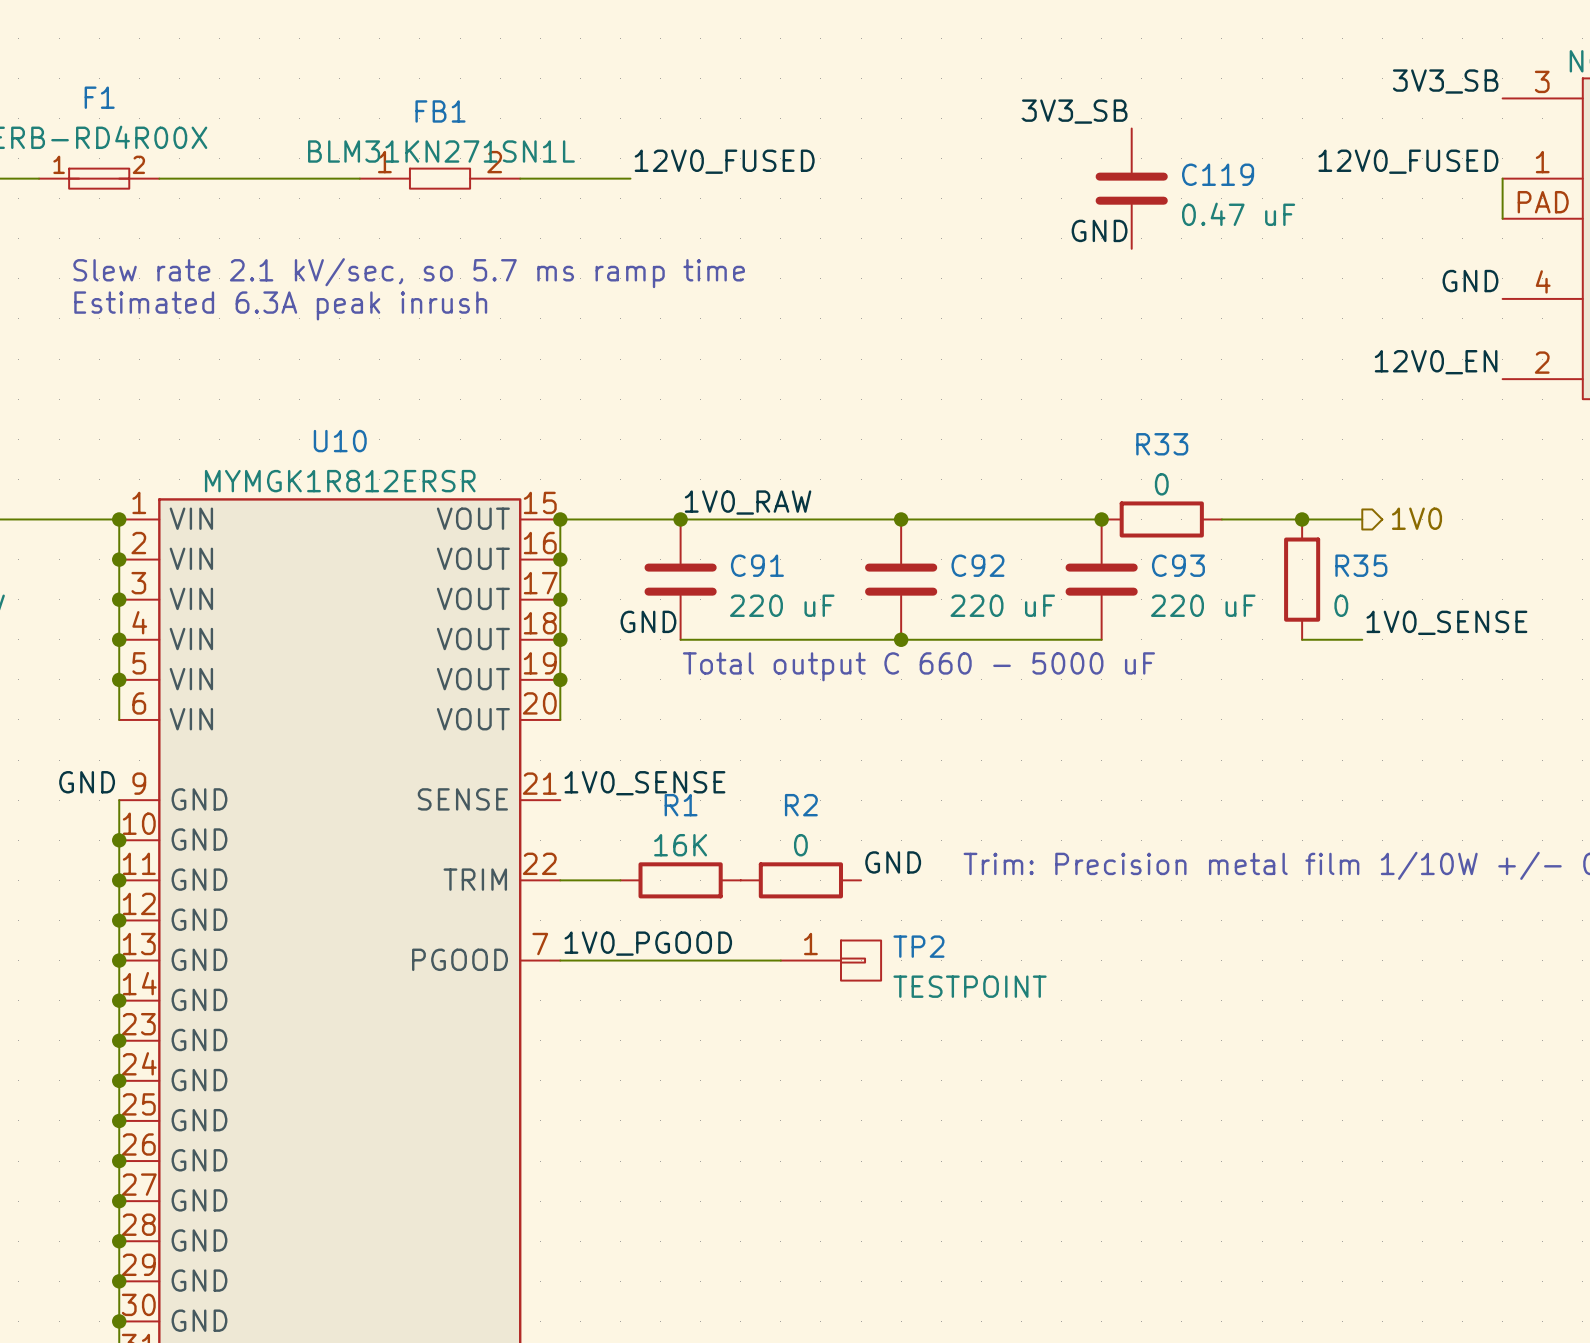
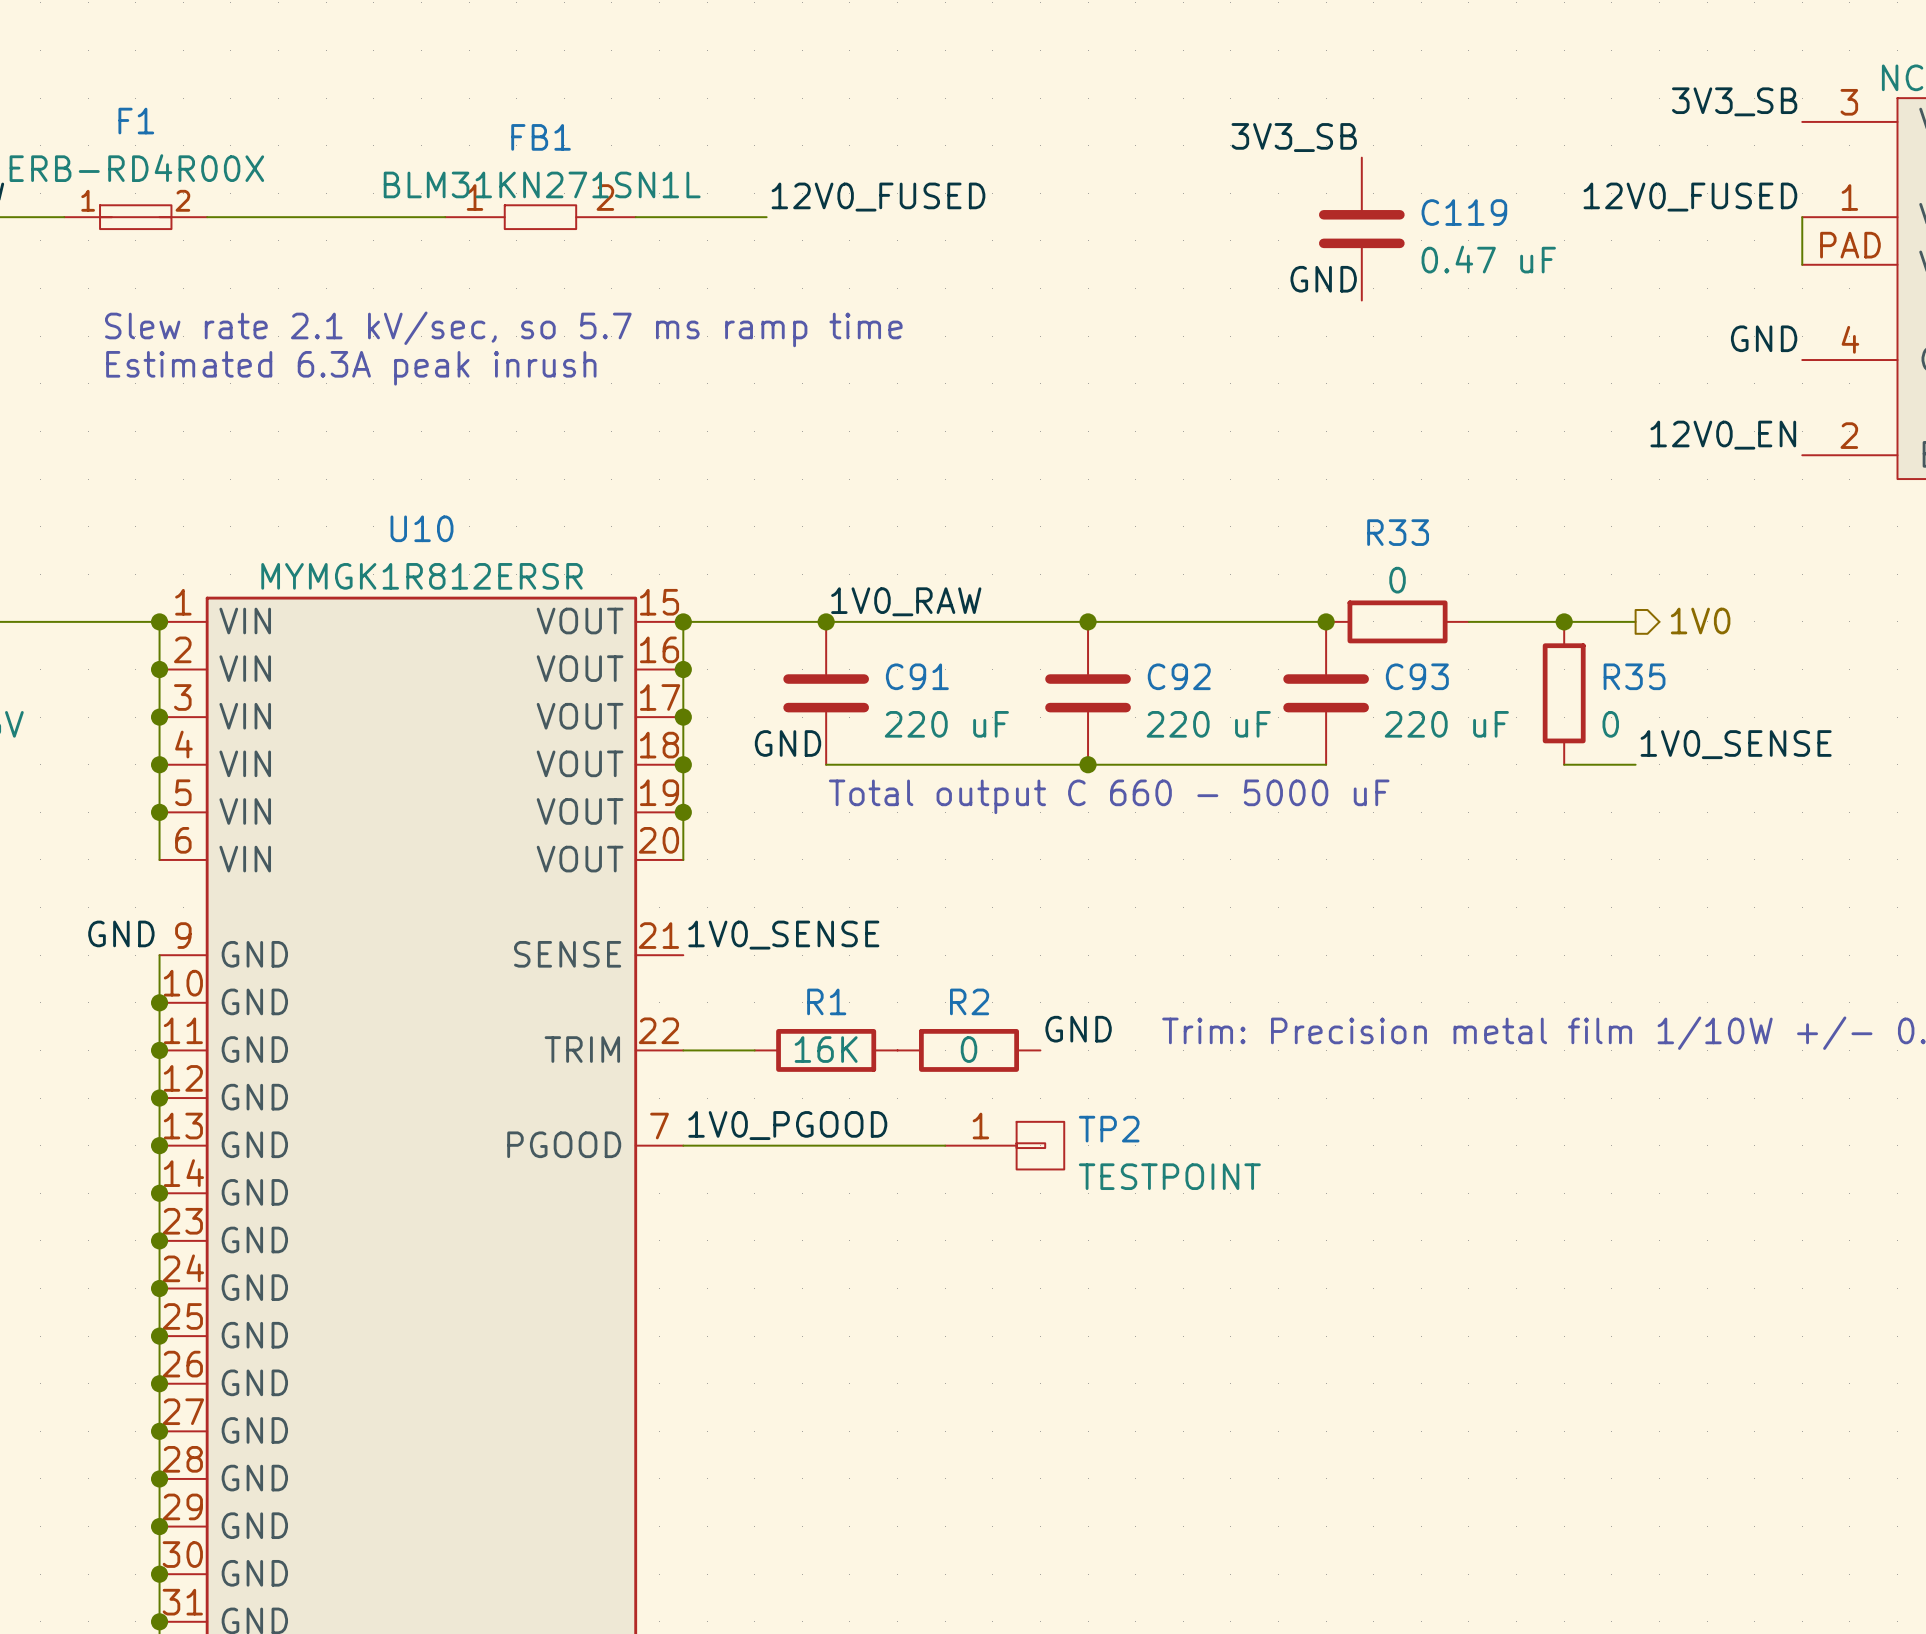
R1 name position: R1 (681, 805) -> R1 (826, 1001)
R2 name position: R2 (801, 805) -> R2 (969, 1001)
R1 value position: 16K (680, 845) -> 16K (826, 1049)
R2 value position: 0 (800, 845) -> 0 (969, 1049)

